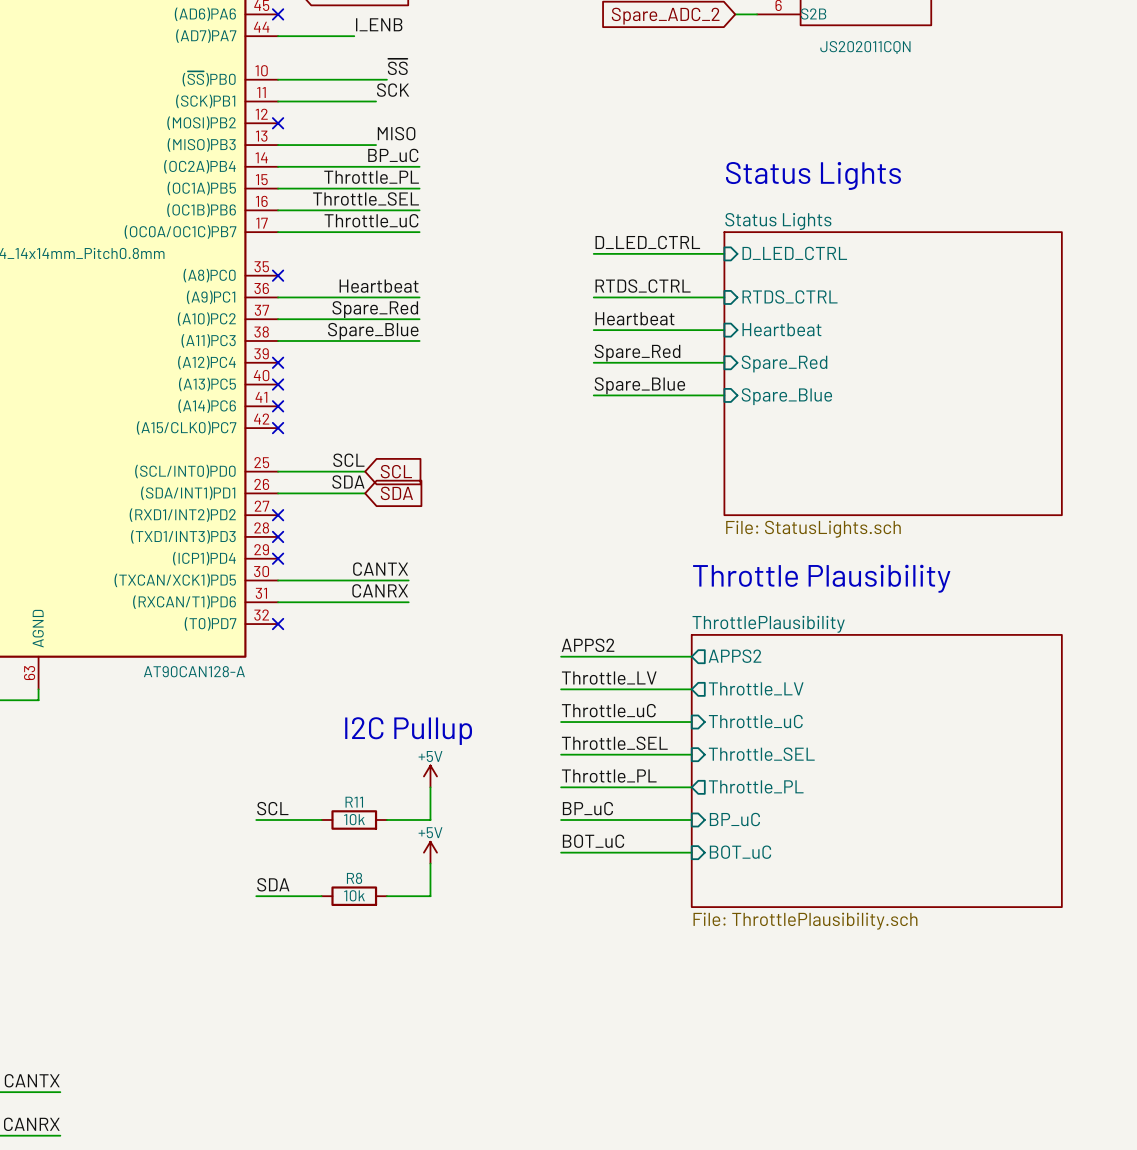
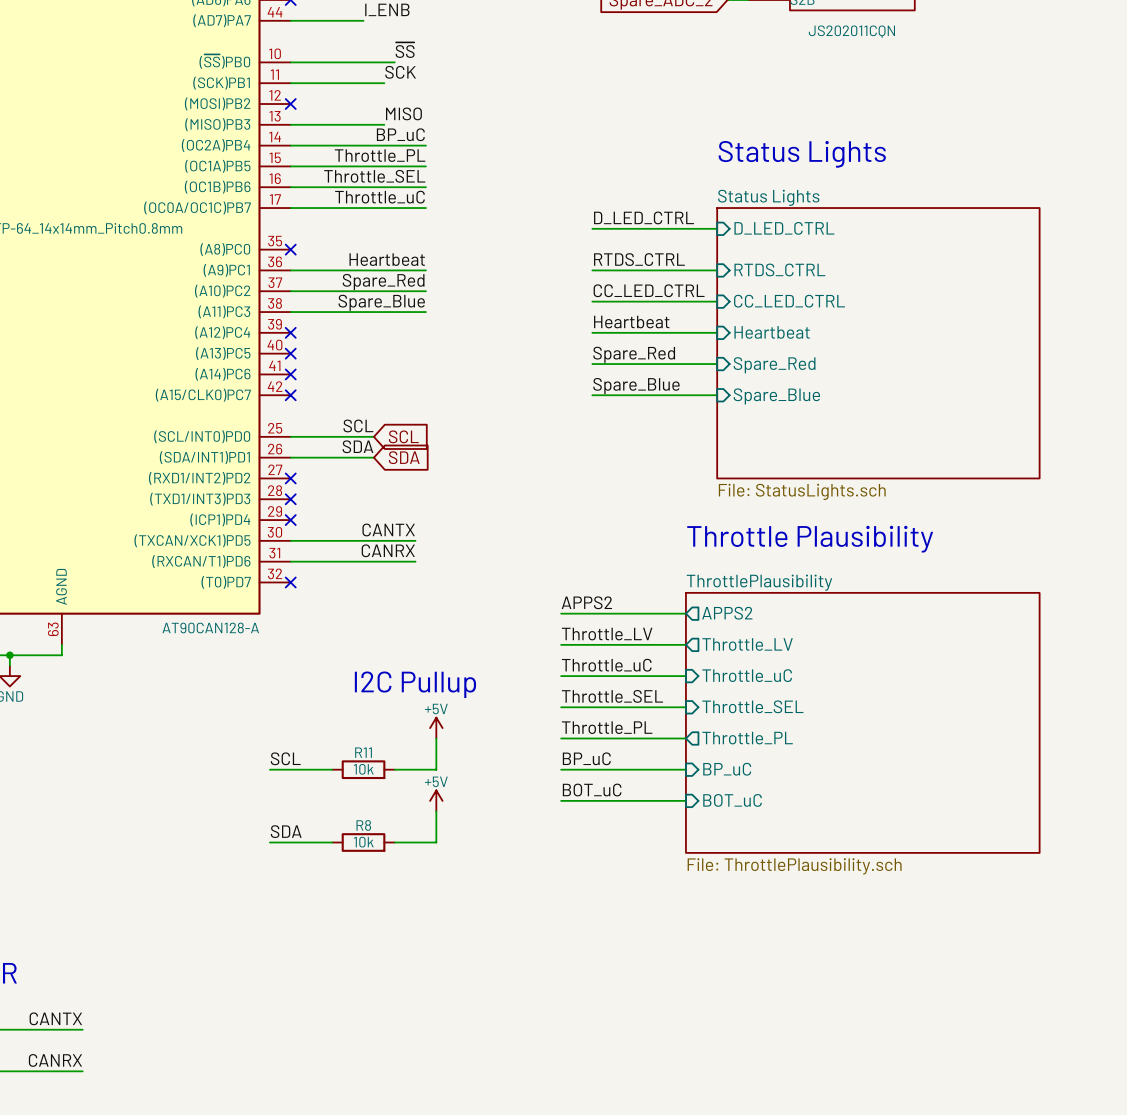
label: Heartbeat (634, 318) -> CC_LED_CTRL (649, 290)
sheet pin: Heartbeat (781, 329) -> CC_LED_CTRL (789, 301)
label: Spare_Red (637, 353) -> Heartbeat (631, 322)
sheet pin: Spare_Red (784, 364) -> Heartbeat (772, 332)
label: Spare_Blue (639, 385) -> Spare_Red (634, 354)
sheet pin: Spare_Blue (786, 396) -> Spare_Red (774, 365)
label: none -> Spare_Blue (636, 386)
wire: none -> (592, 395) (717, 395)
sheet pin: none -> Spare_Blue (776, 396)

